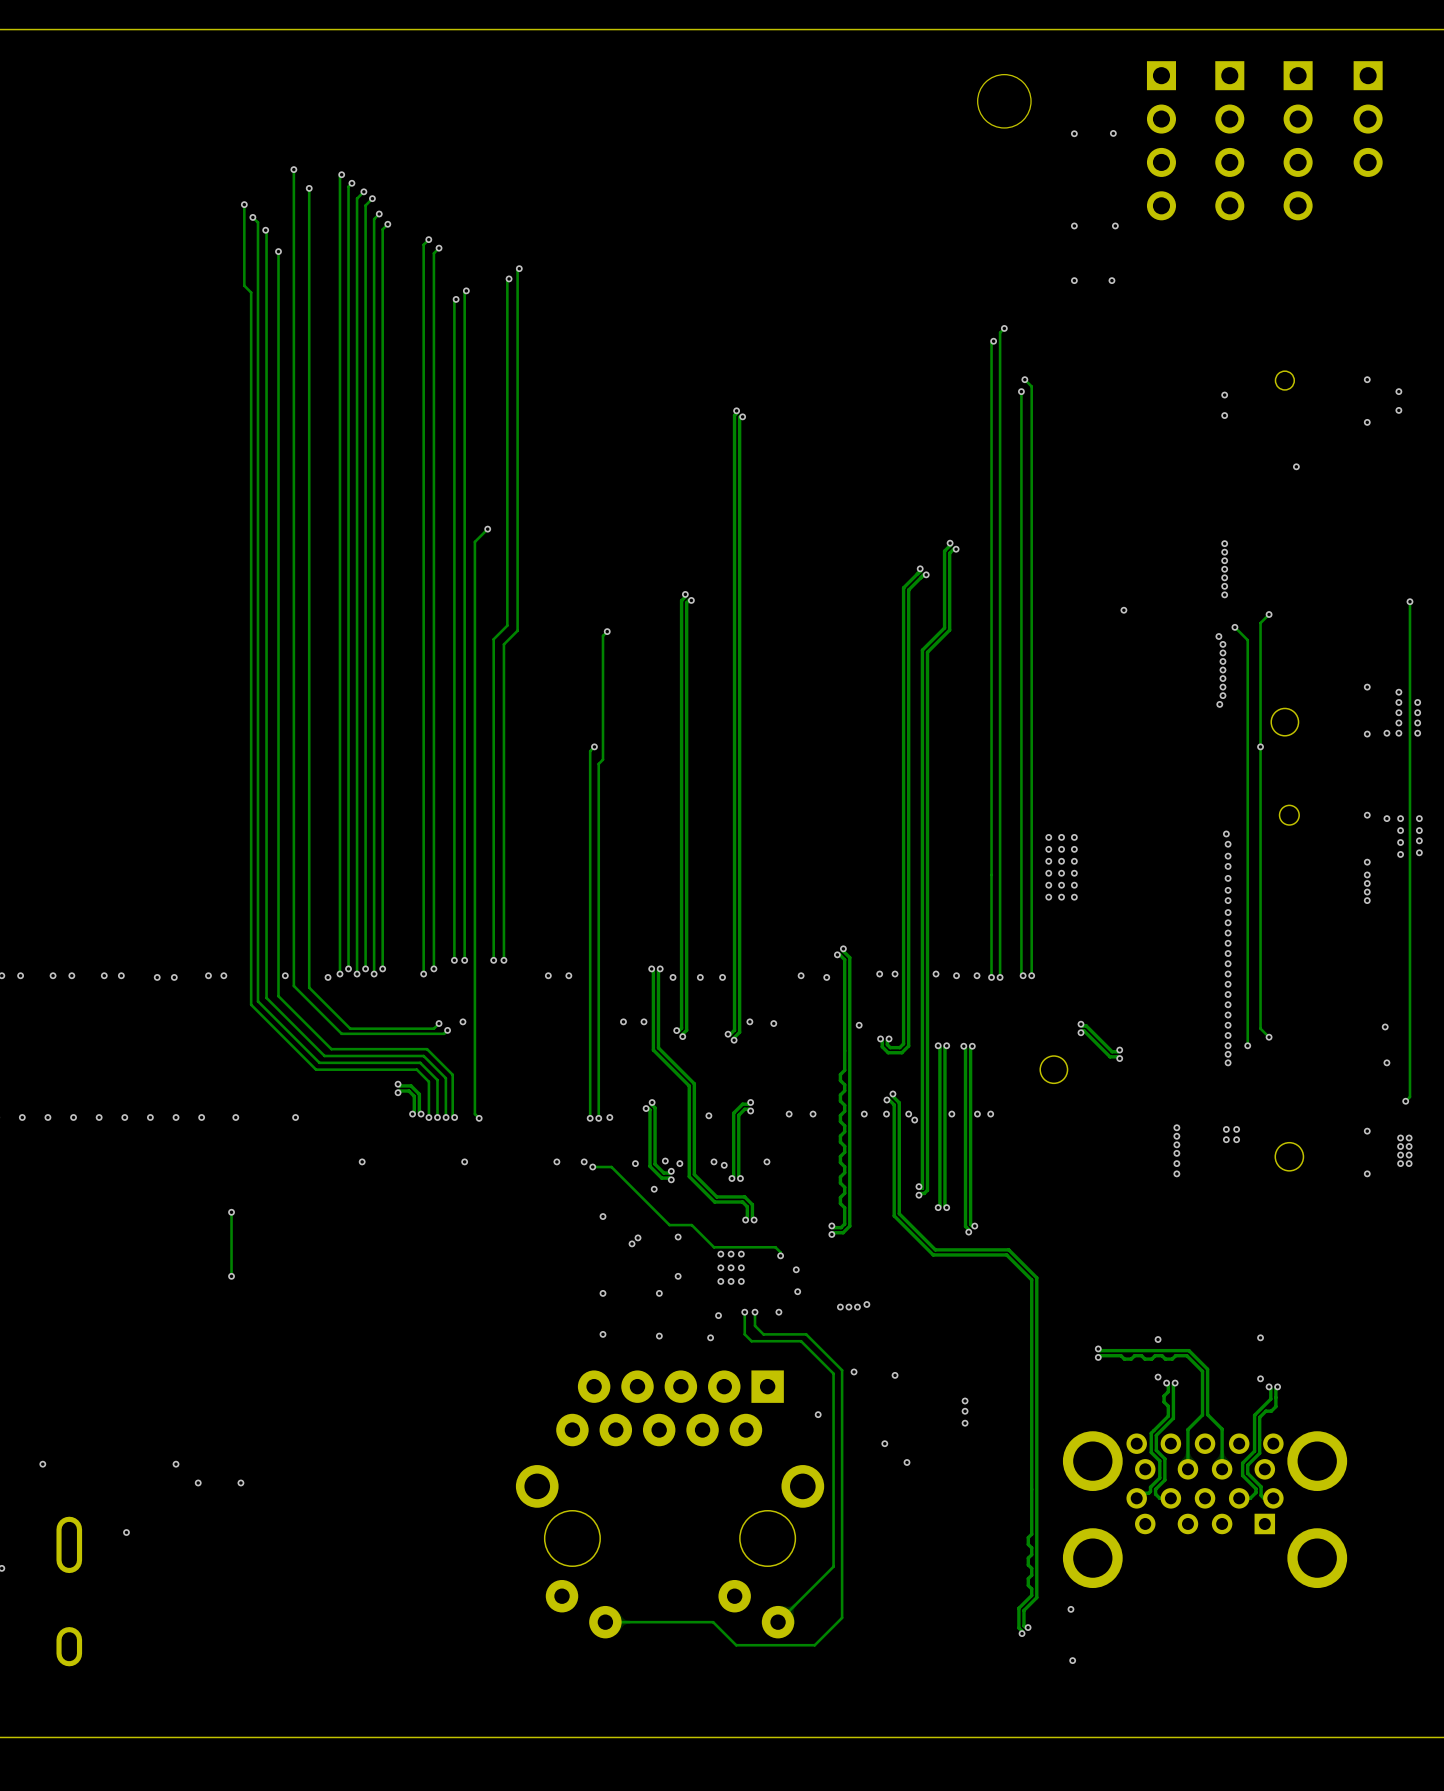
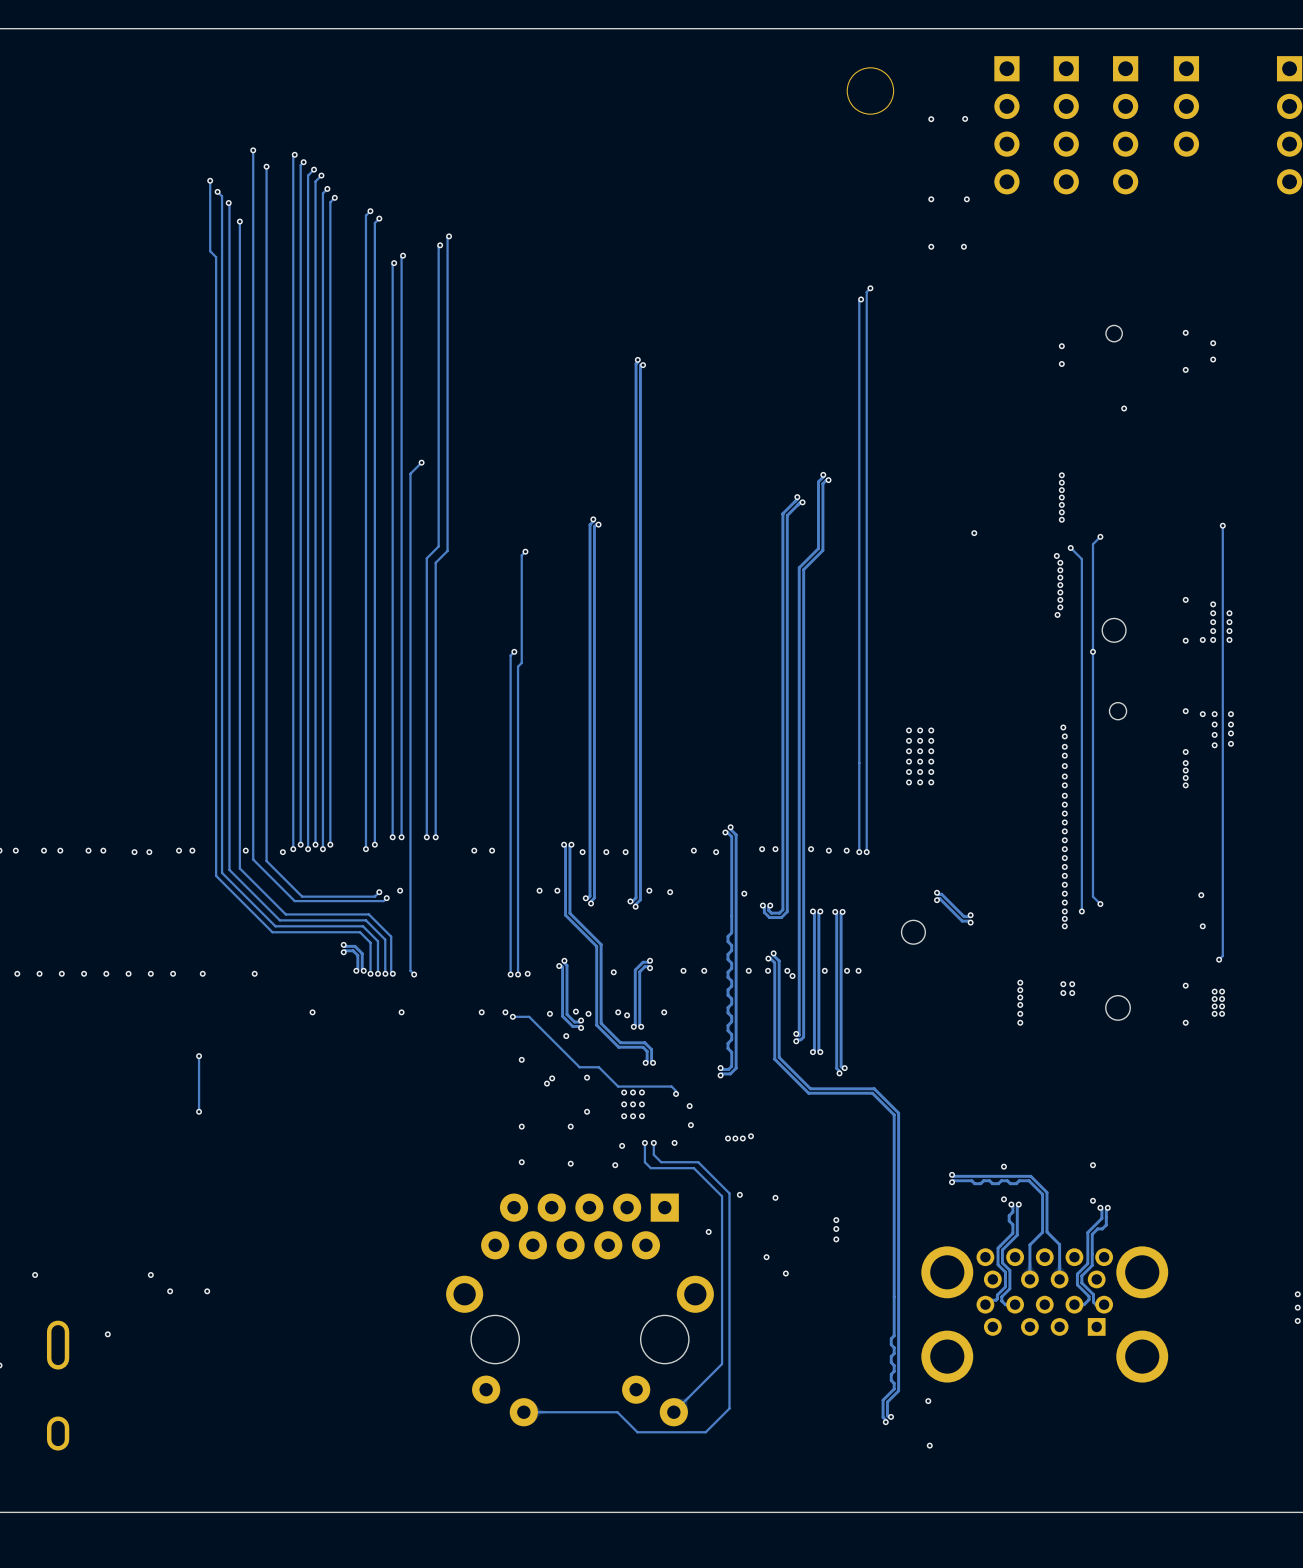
track: (1024, 379) (1031, 386) (1031, 975) -> none
via: (1024, 379) -> none
track: (1021, 391) (1021, 974) (1023, 975) -> none
via: (1021, 391) -> none
via: (1023, 975) -> none
via: (1031, 975) -> none

